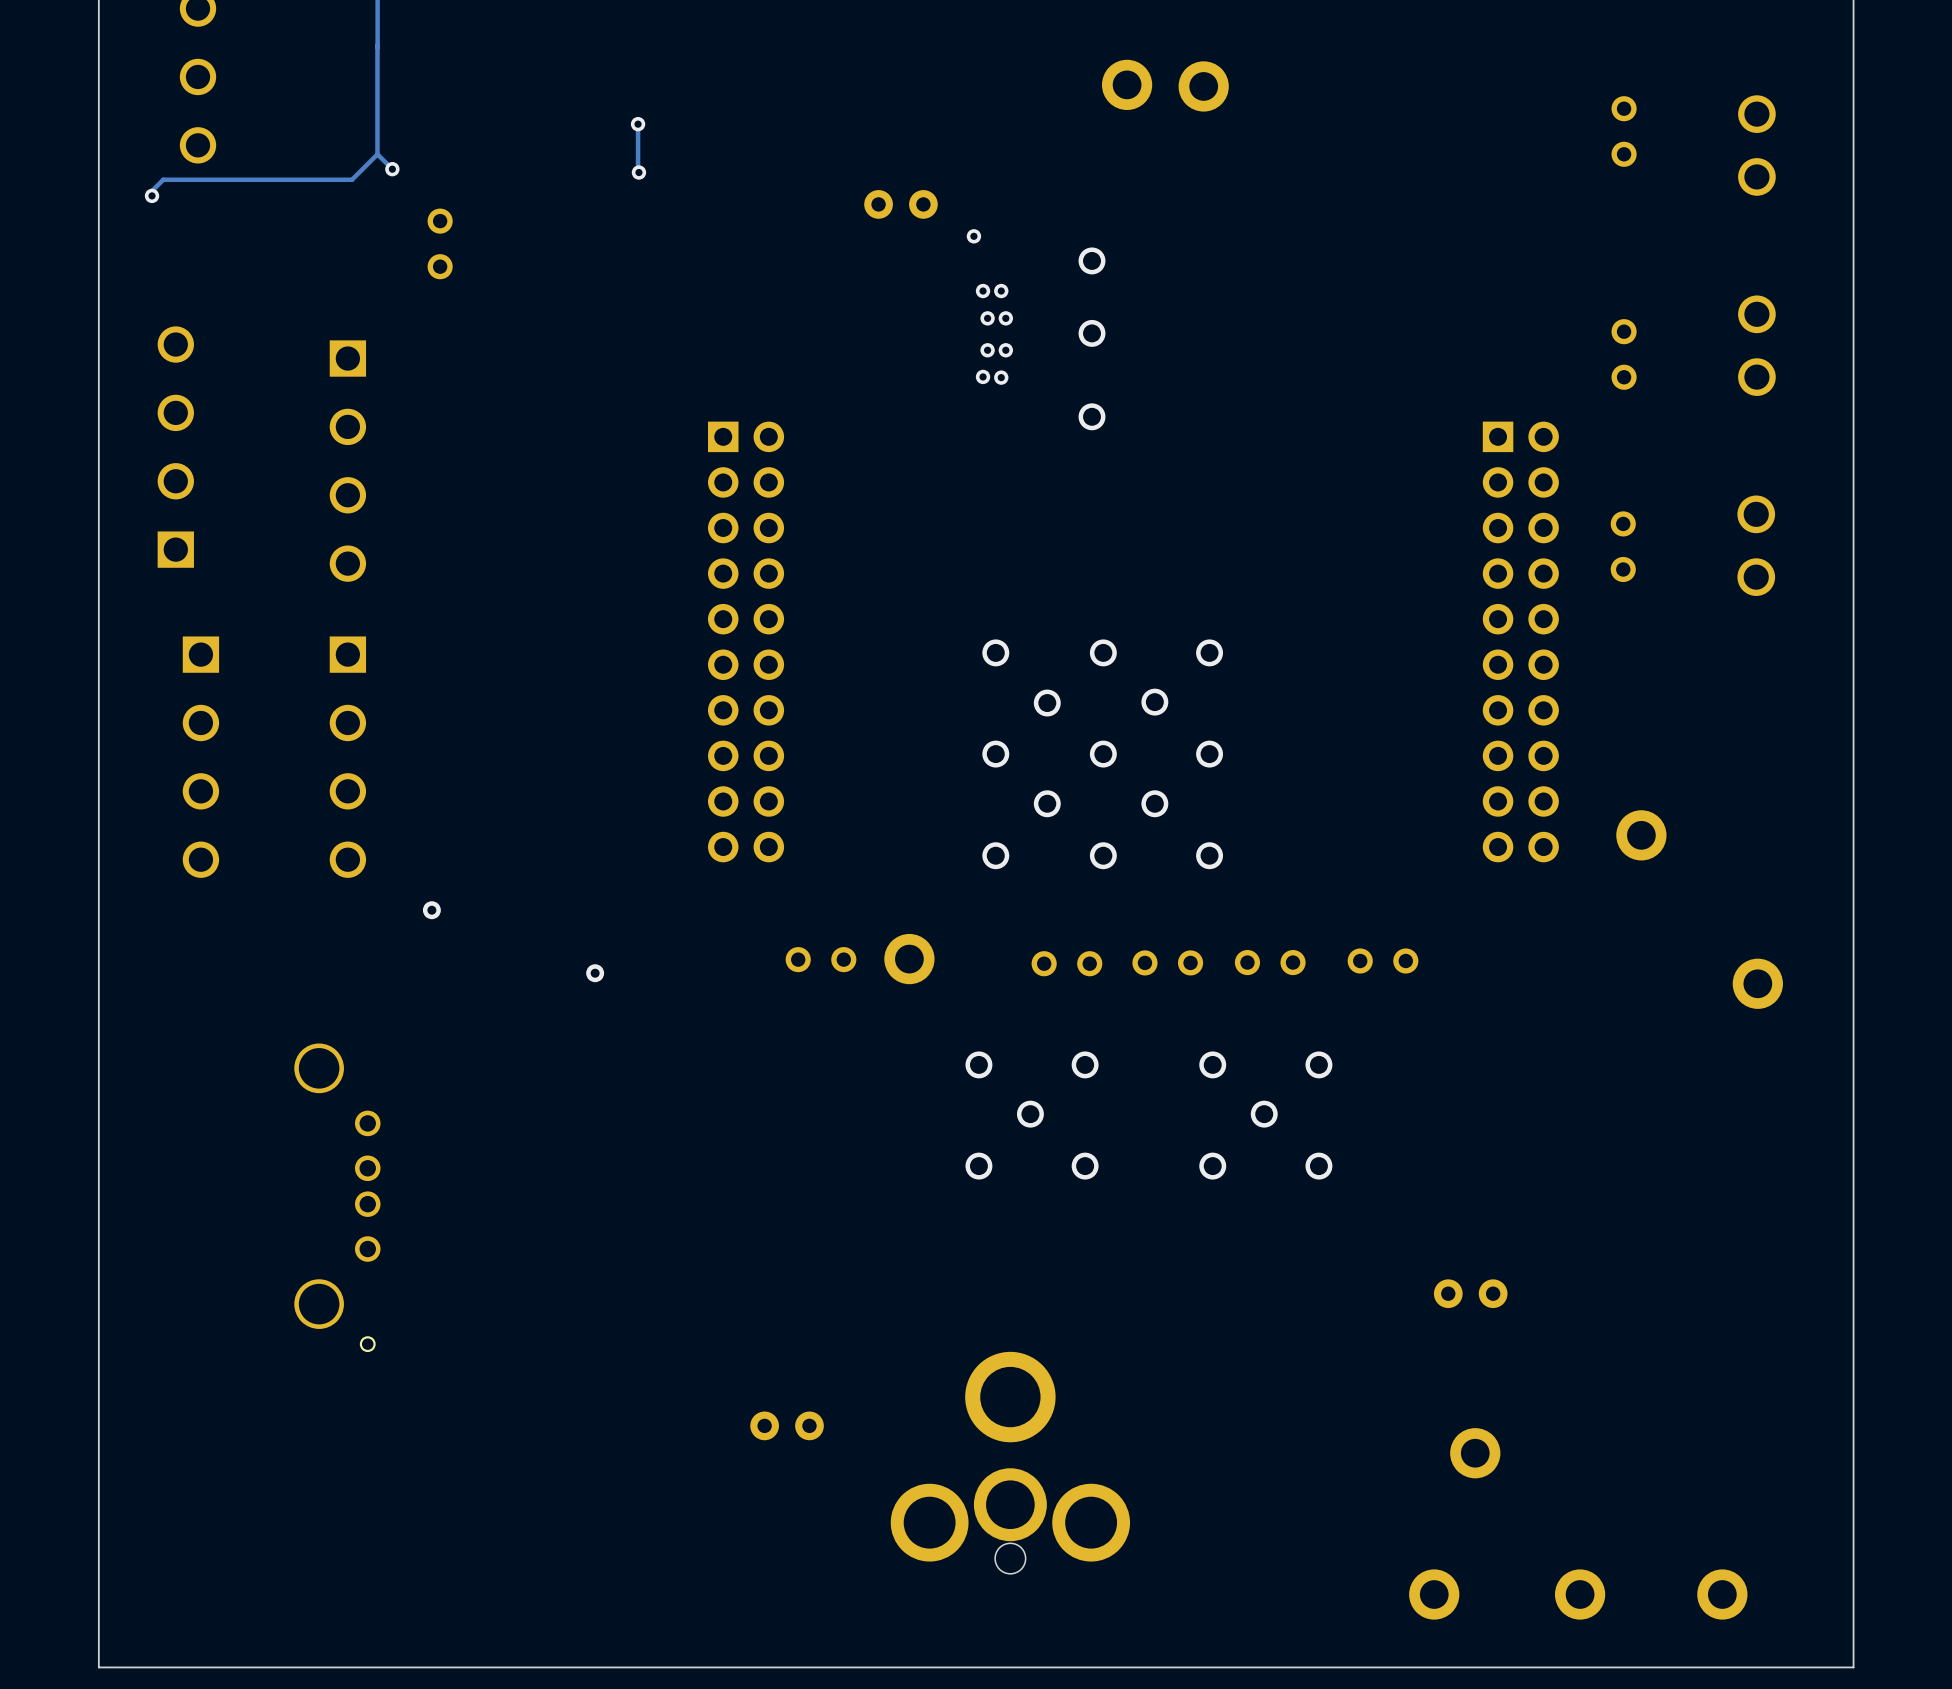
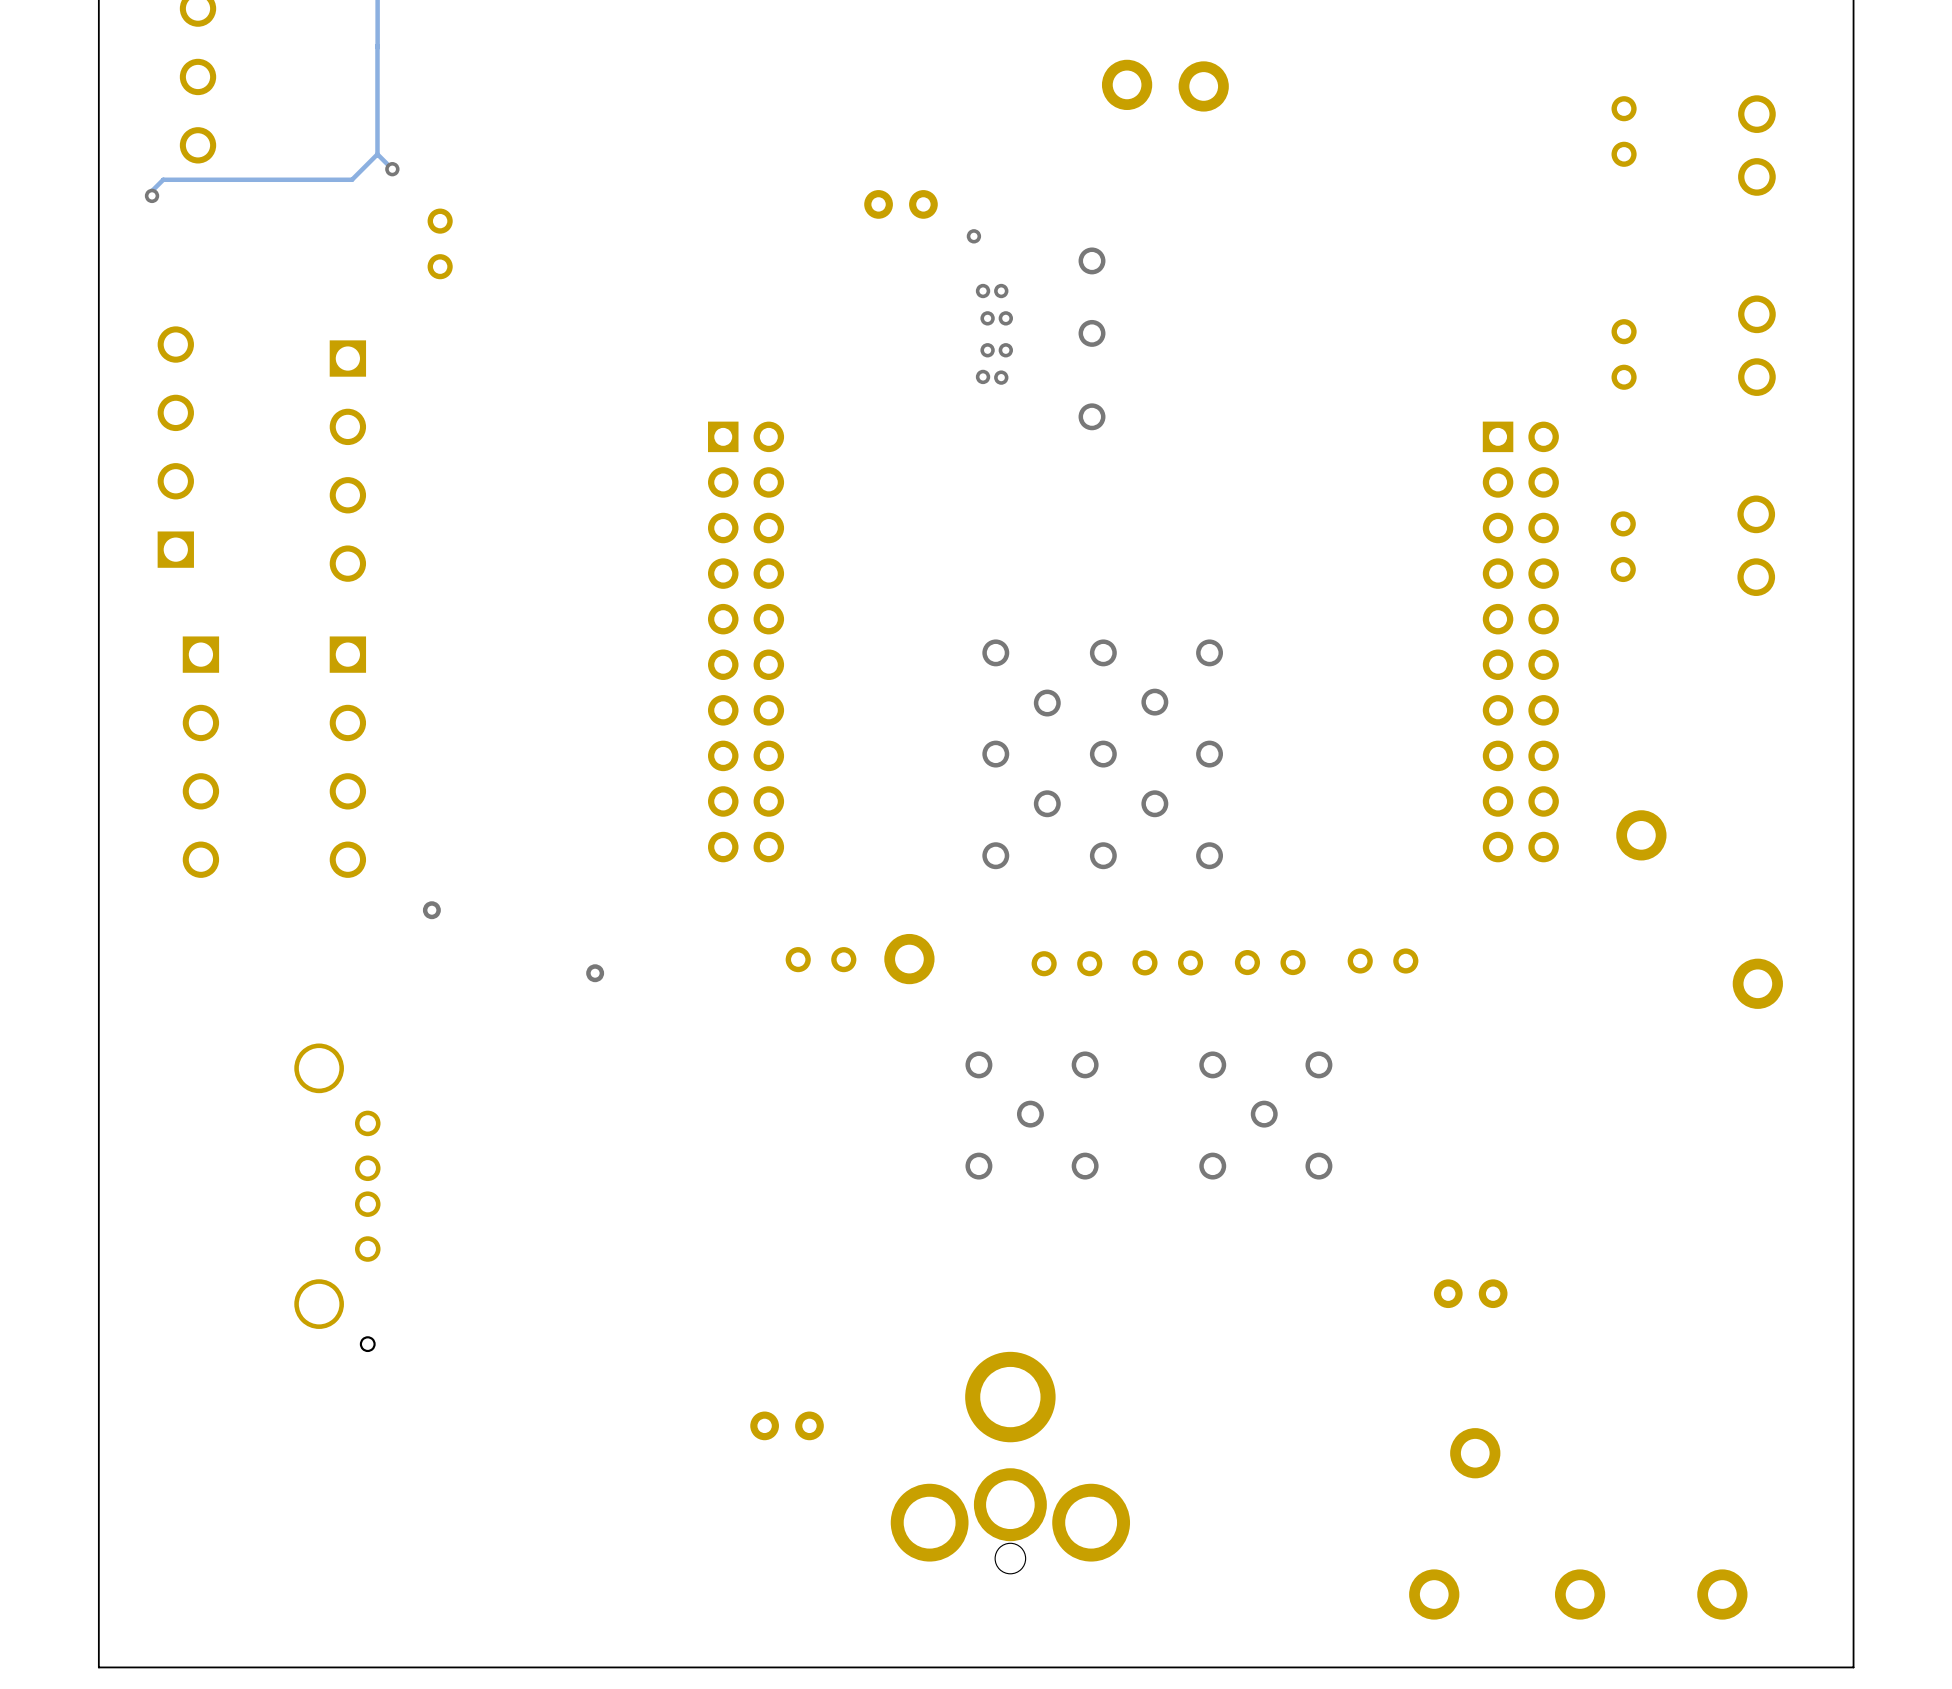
track: (638, 124) (638, 172) -> none
via: (638, 124) -> none
via: (638, 172) -> none

